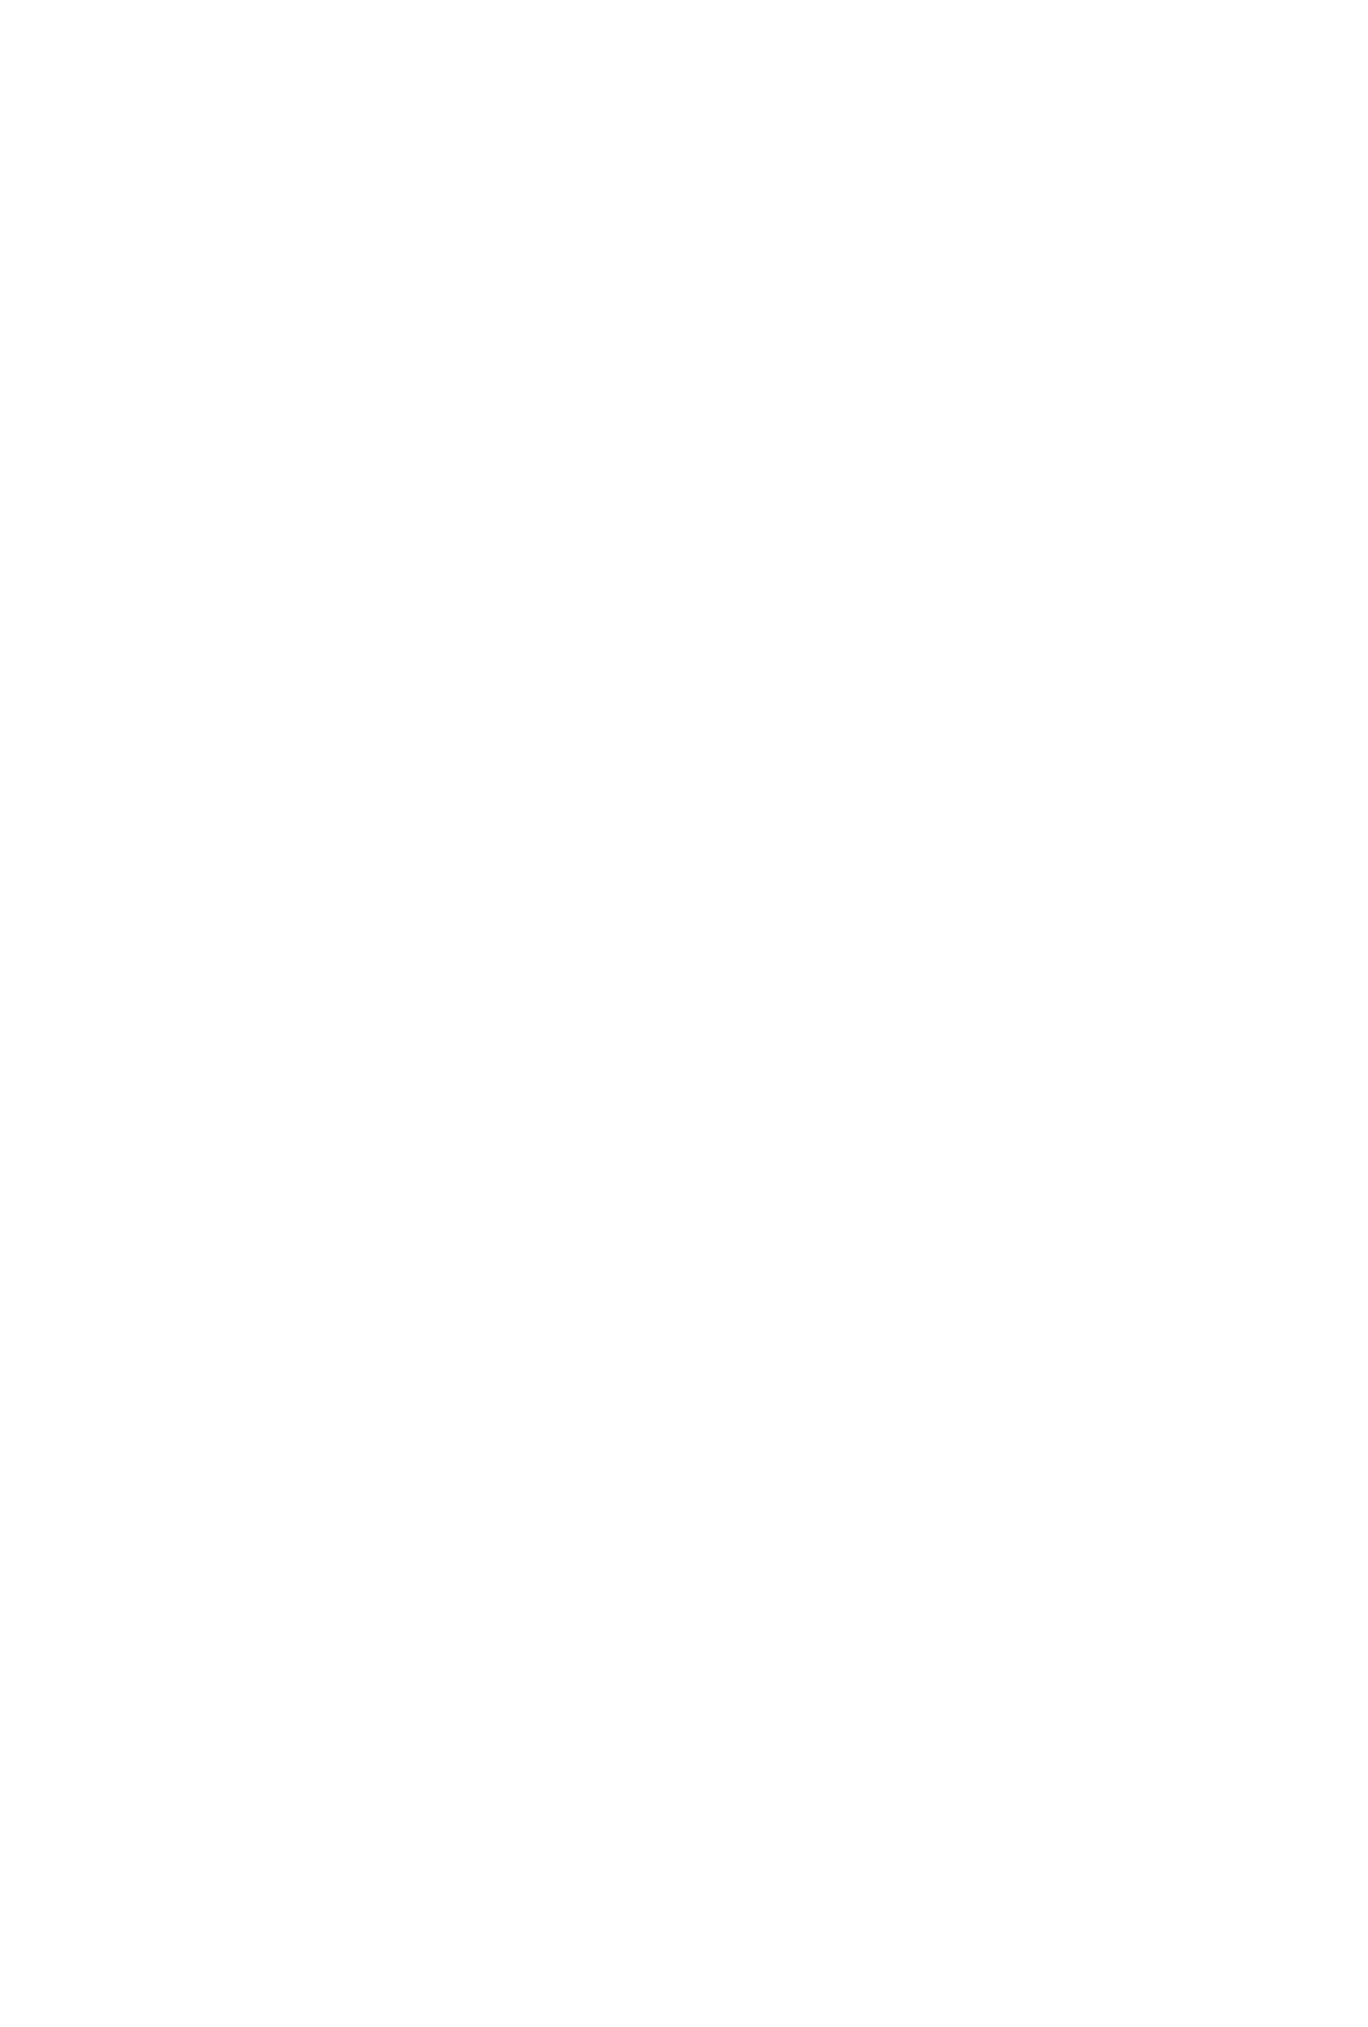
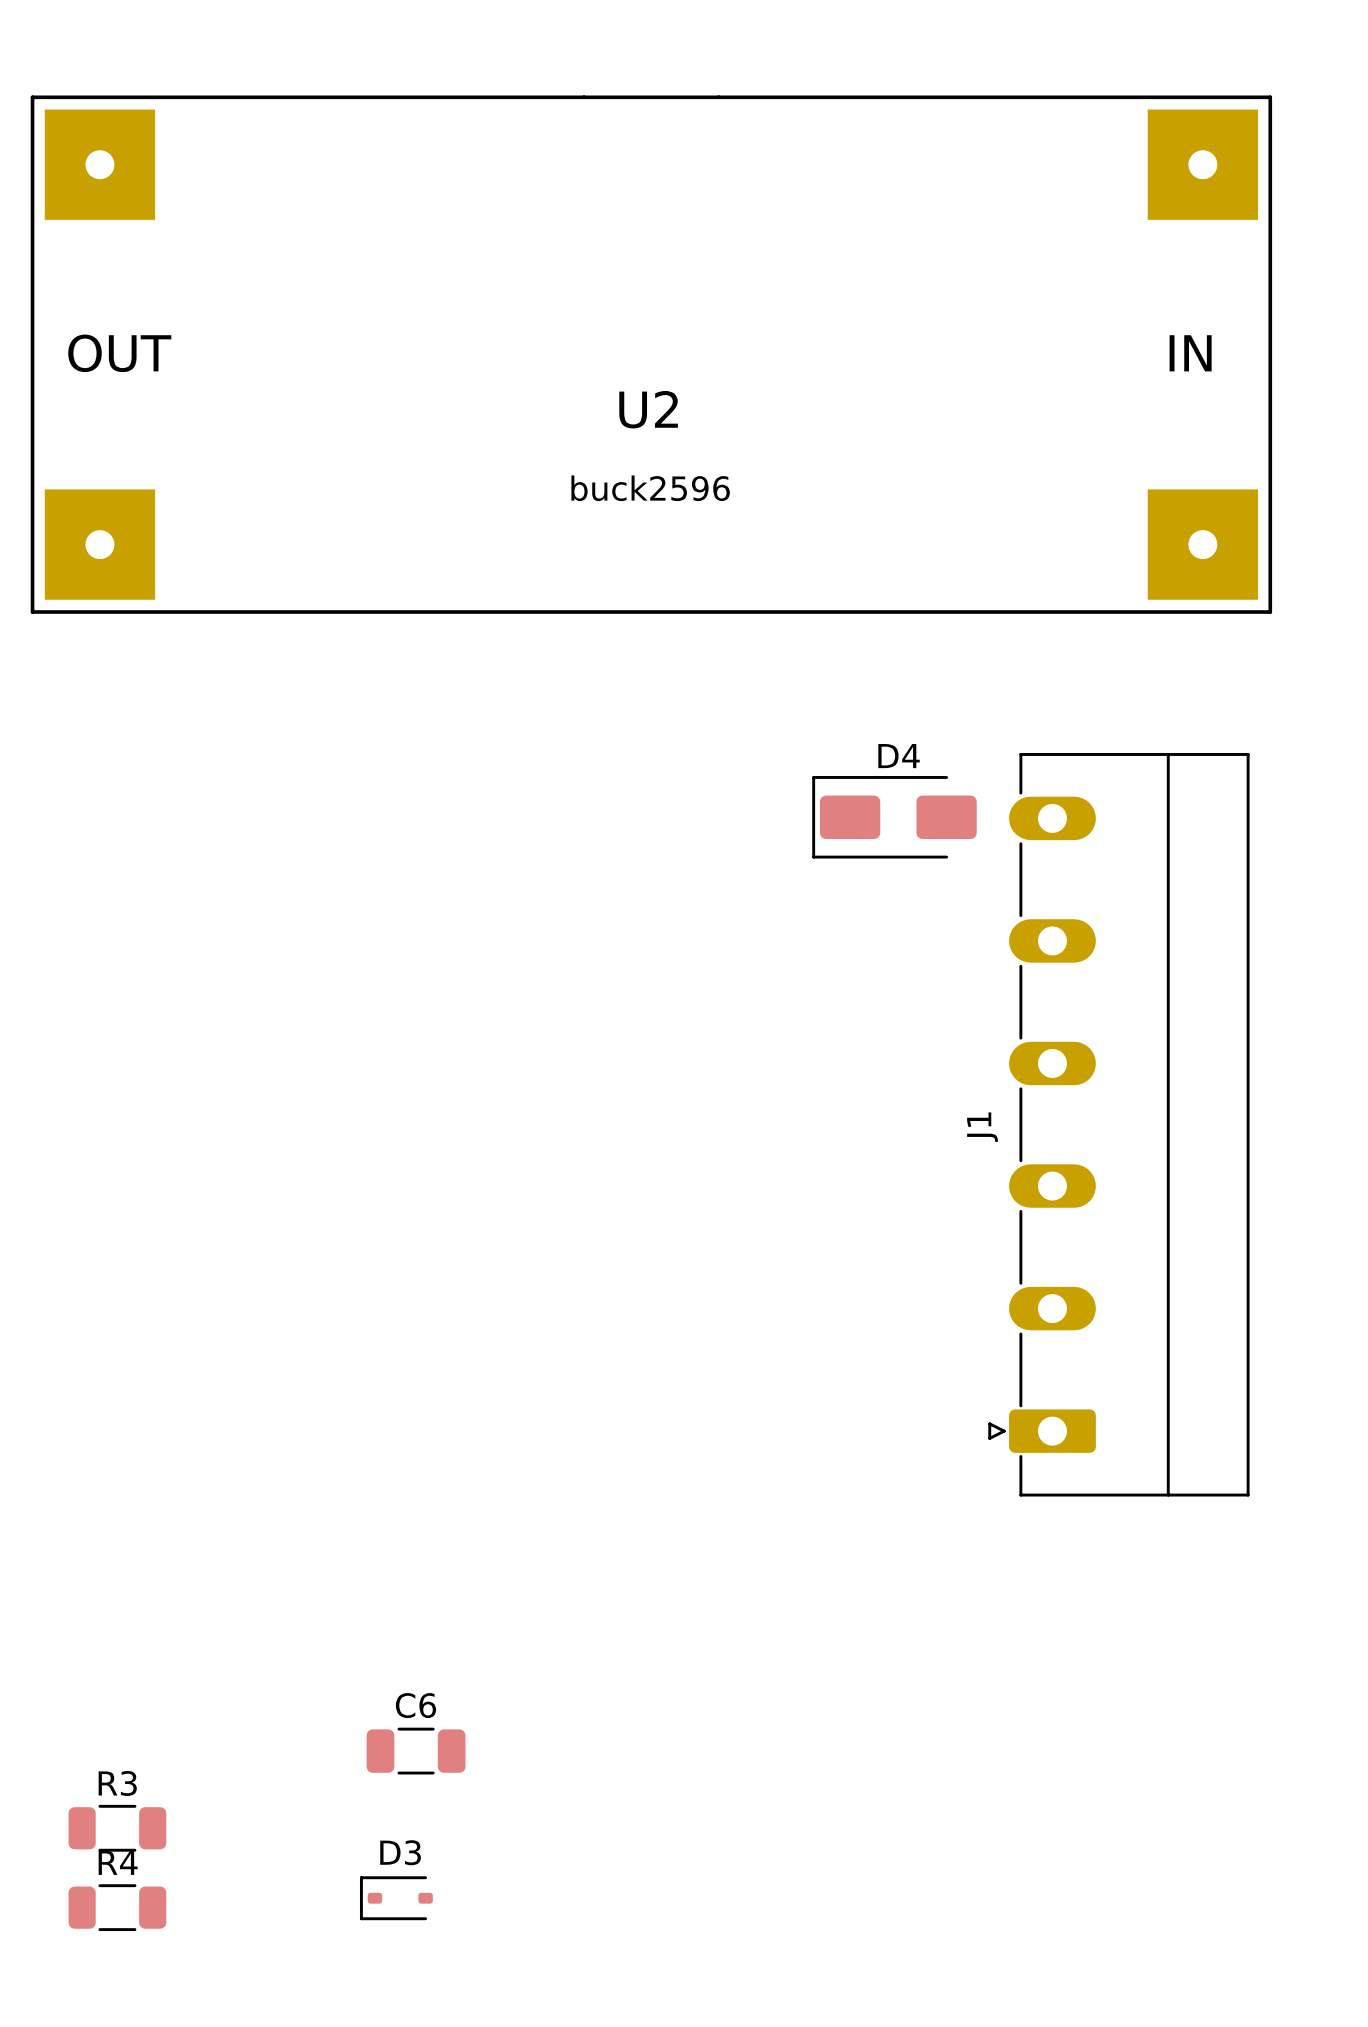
U2: none -> buck2596 (651, 354)
D4: none -> (894, 817)
J1: none -> (1118, 1124)
C6: none -> (416, 1751)
R3: none -> (117, 1828)
D3: none -> (396, 1898)
R4: none -> (117, 1907)

